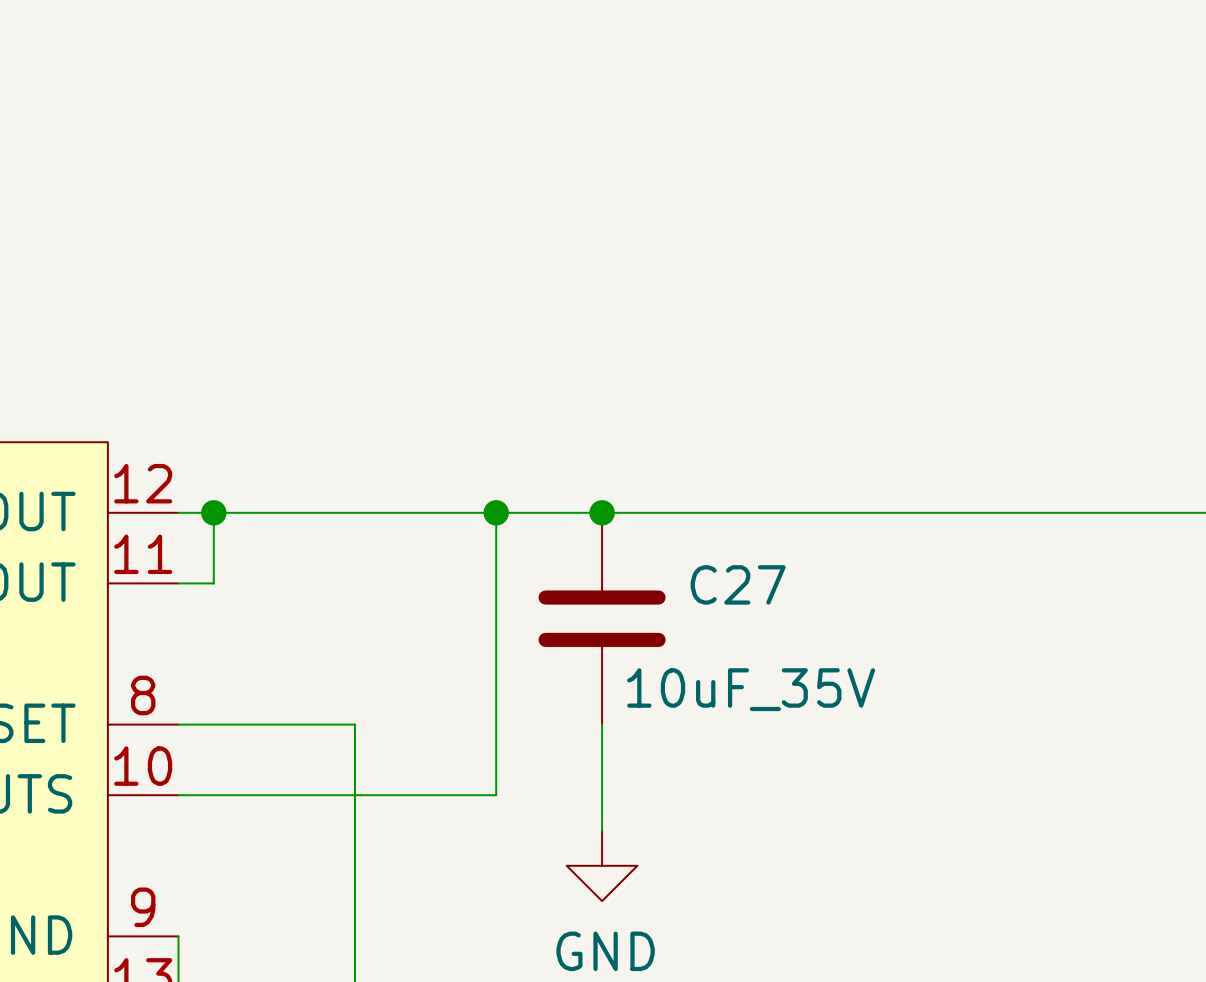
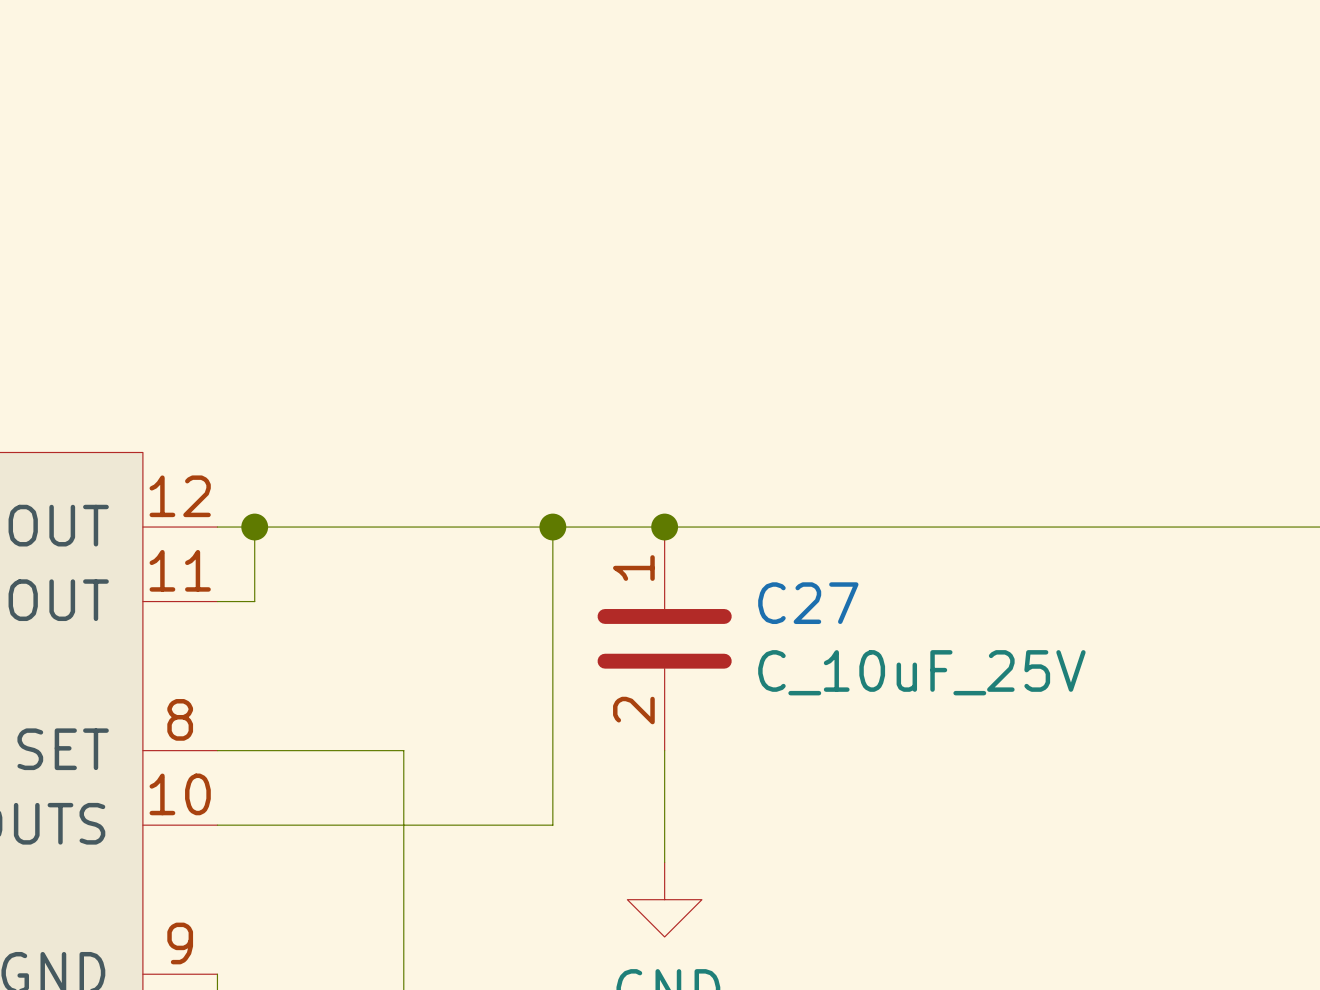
C27 pin number: none -> 1 (633, 568)
C27 pin number: none -> 2 (633, 710)
C27 value: 10uF_35V (751, 689) -> C_10uF_25V (921, 672)

